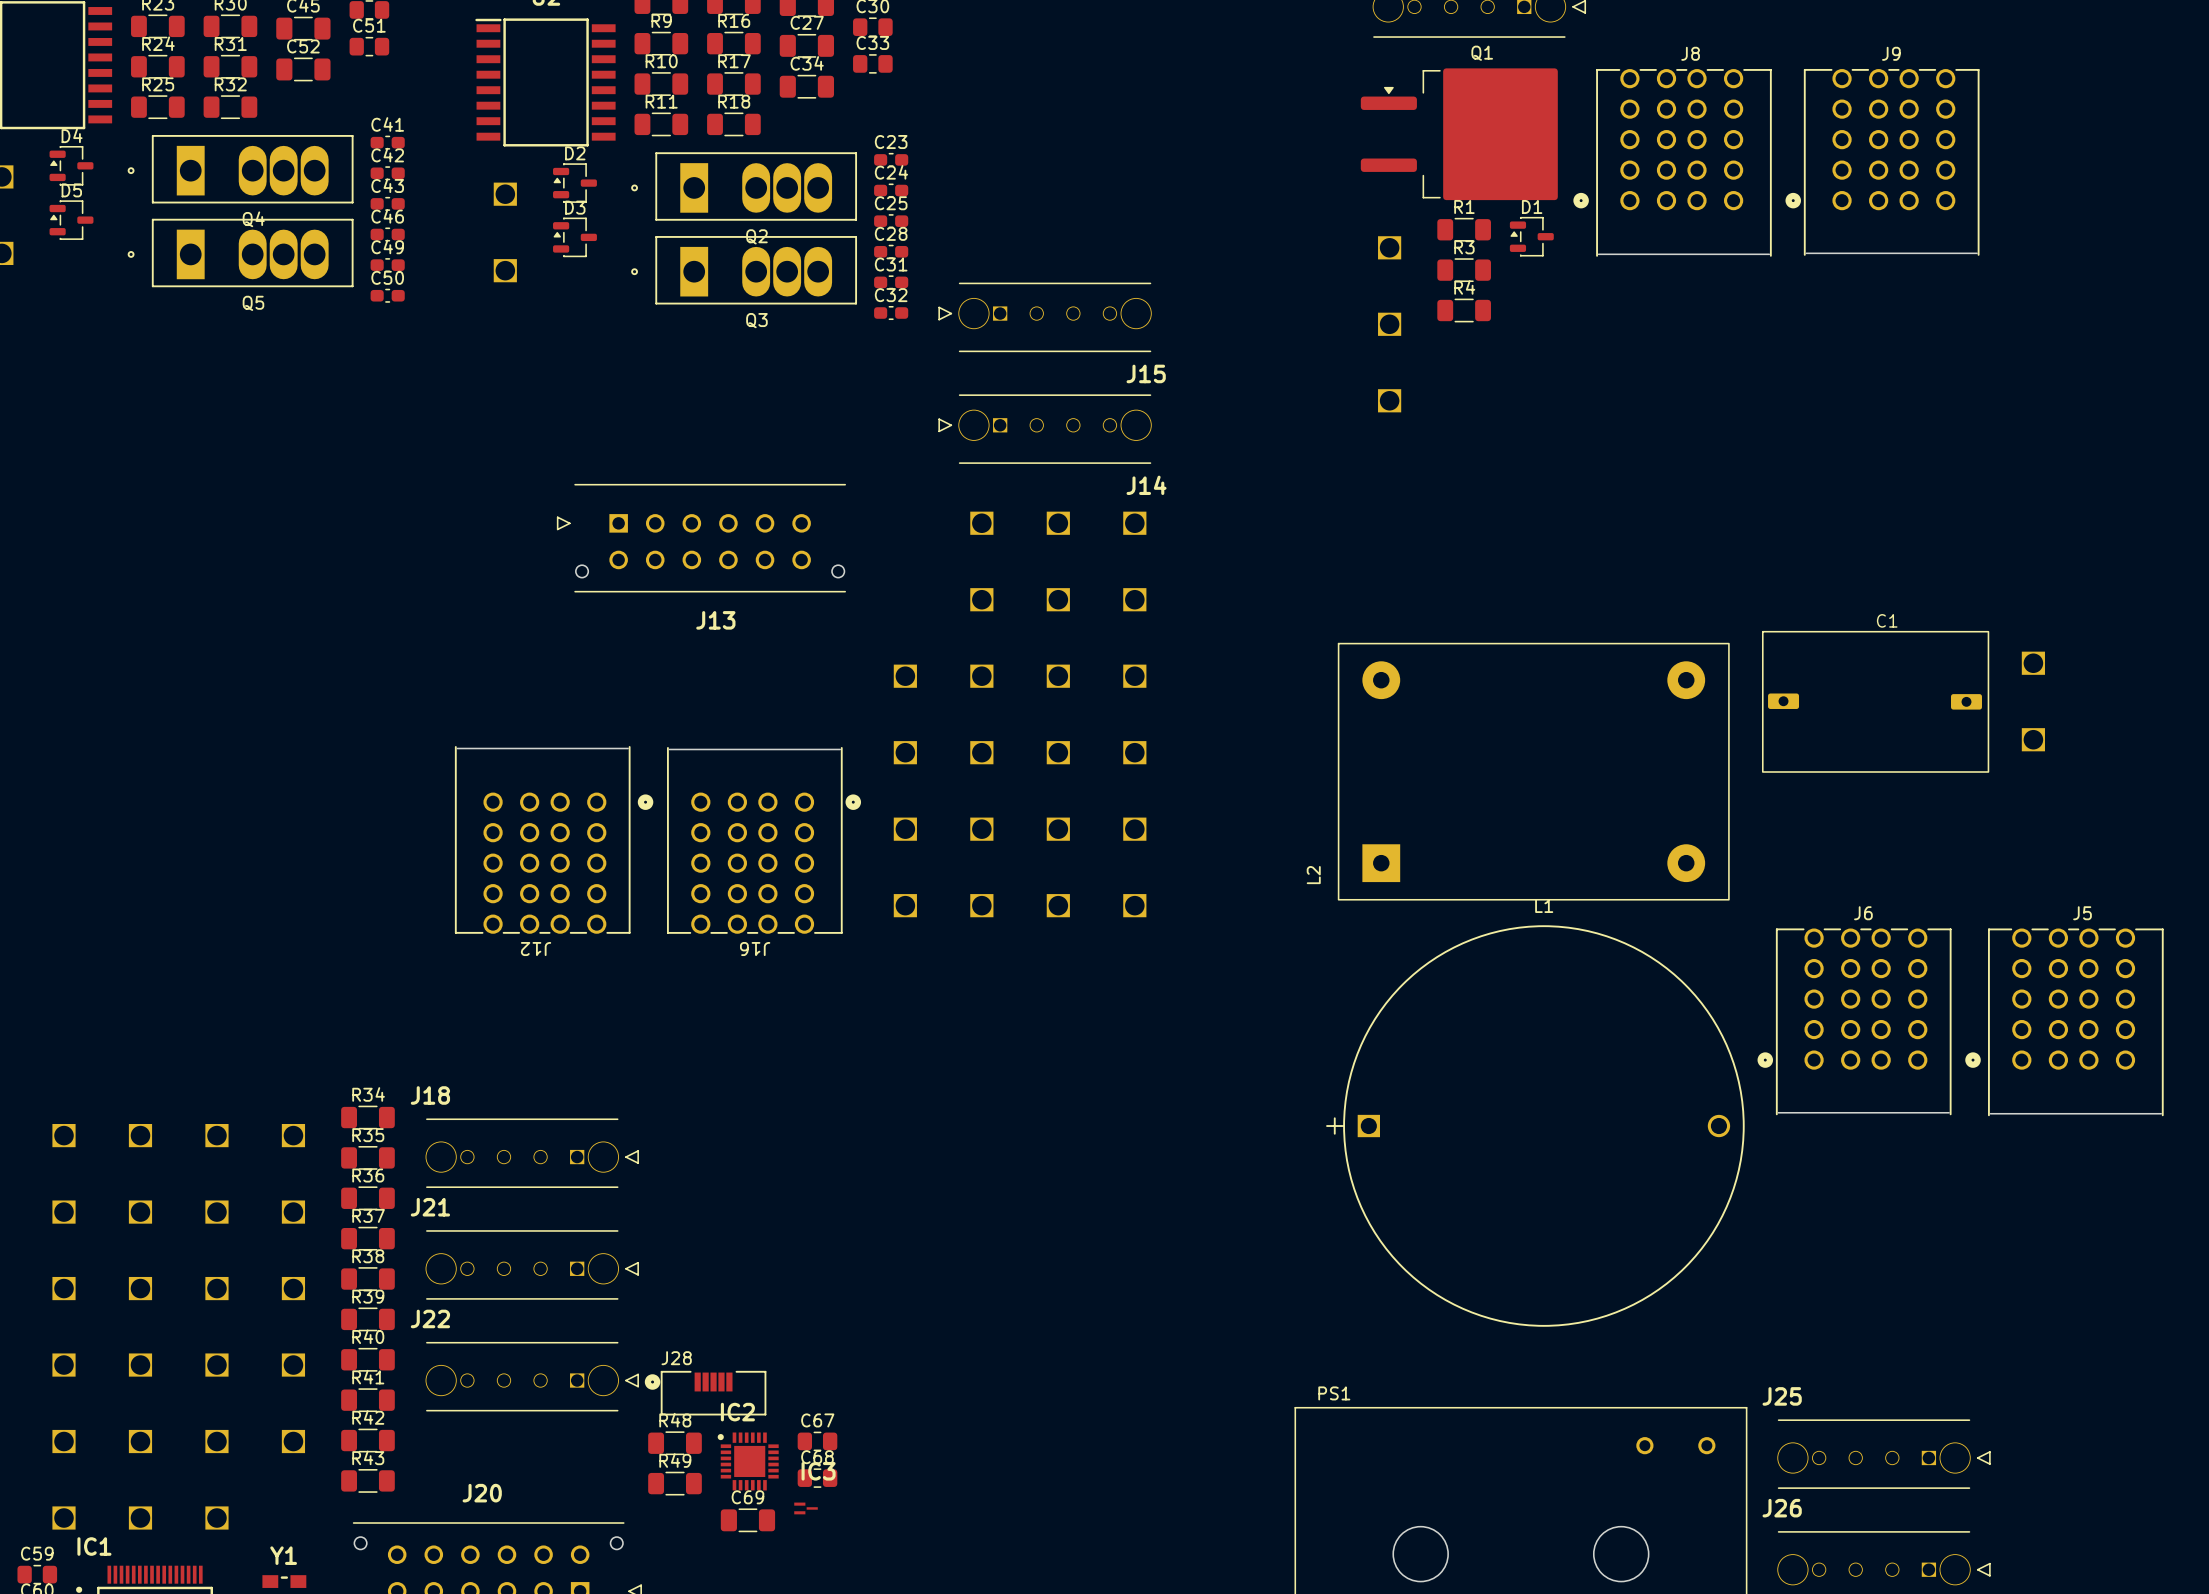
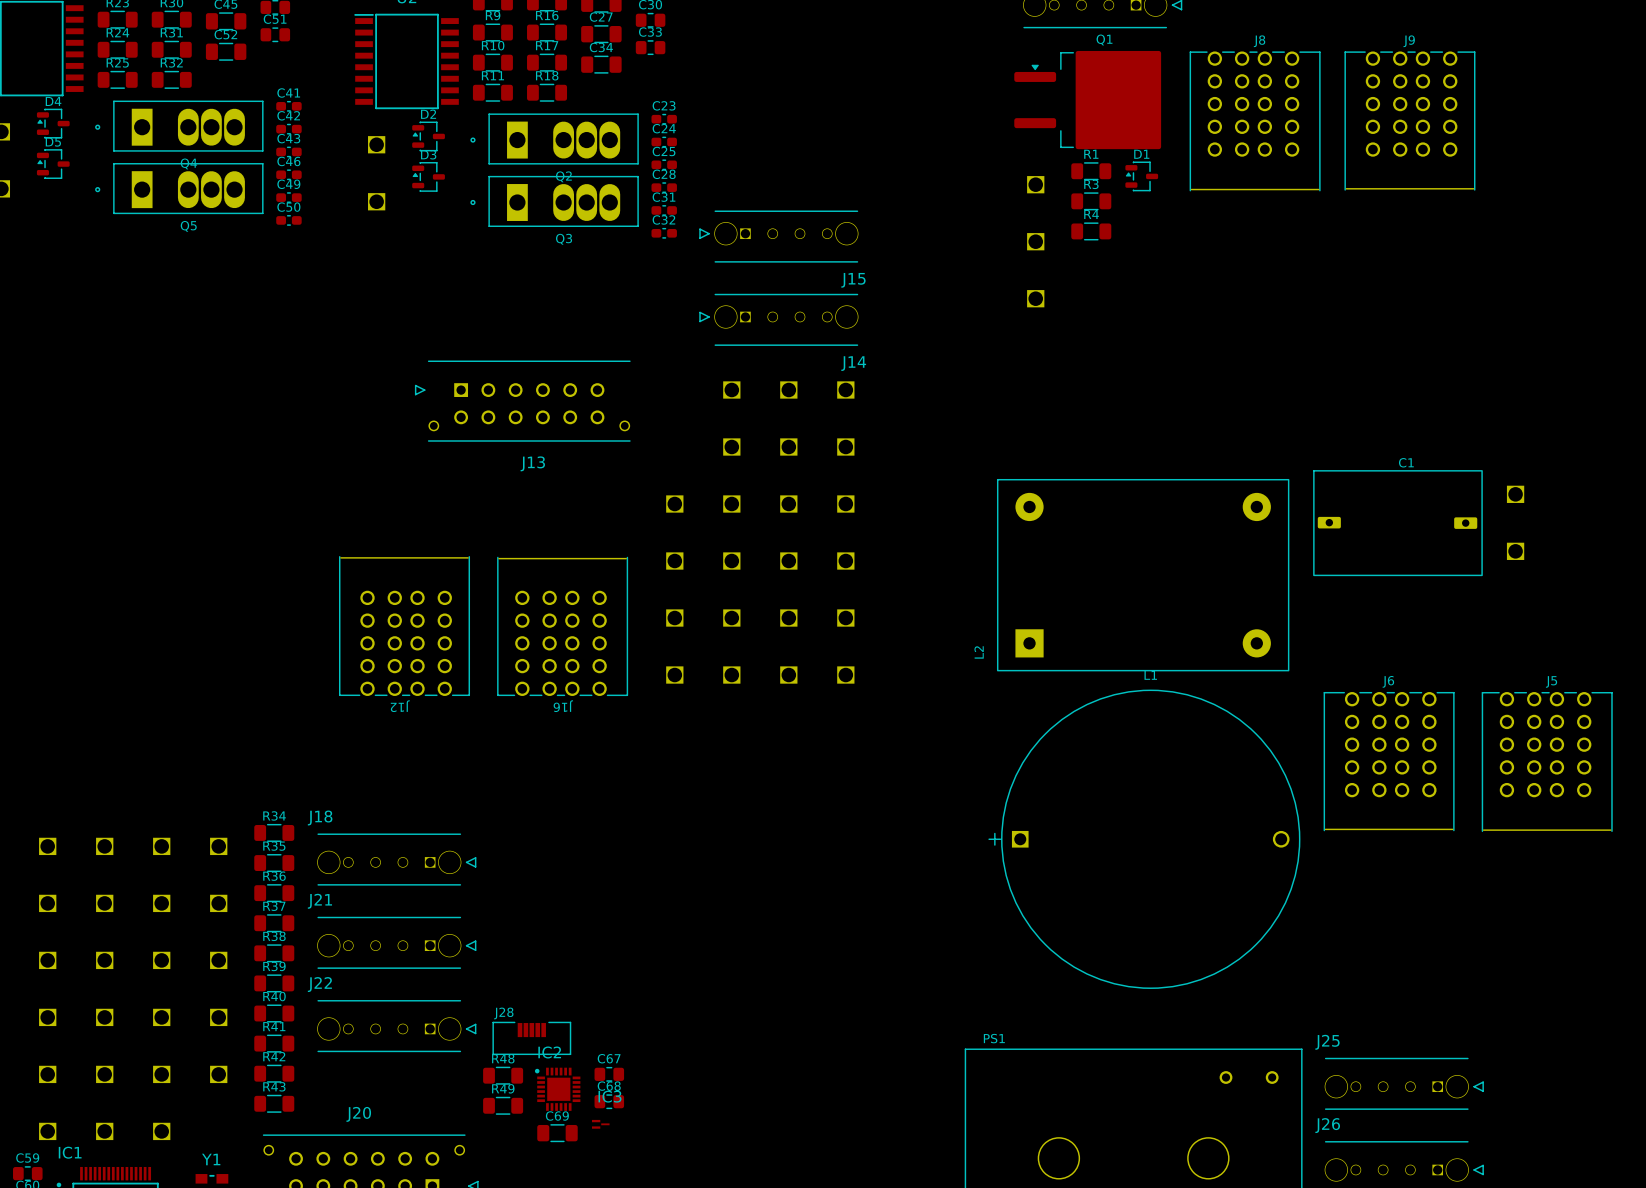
J9 footprint: [1785, 68, 1980, 256] -> [1344, 51, 1476, 191]
J8 footprint: [1573, 69, 1772, 257] -> [1189, 51, 1321, 192]
J12 footprint: [454, 746, 654, 934] -> [339, 556, 470, 696]
J16 footprint: [667, 747, 862, 934] -> [497, 556, 629, 697]
J6 footprint: [1757, 928, 1952, 1116] -> [1323, 691, 1455, 832]
J5 footprint: [1965, 928, 2164, 1117] -> [1481, 692, 1613, 832]
J28 footprint: [644, 1370, 767, 1416] -> [492, 1021, 572, 1056]

